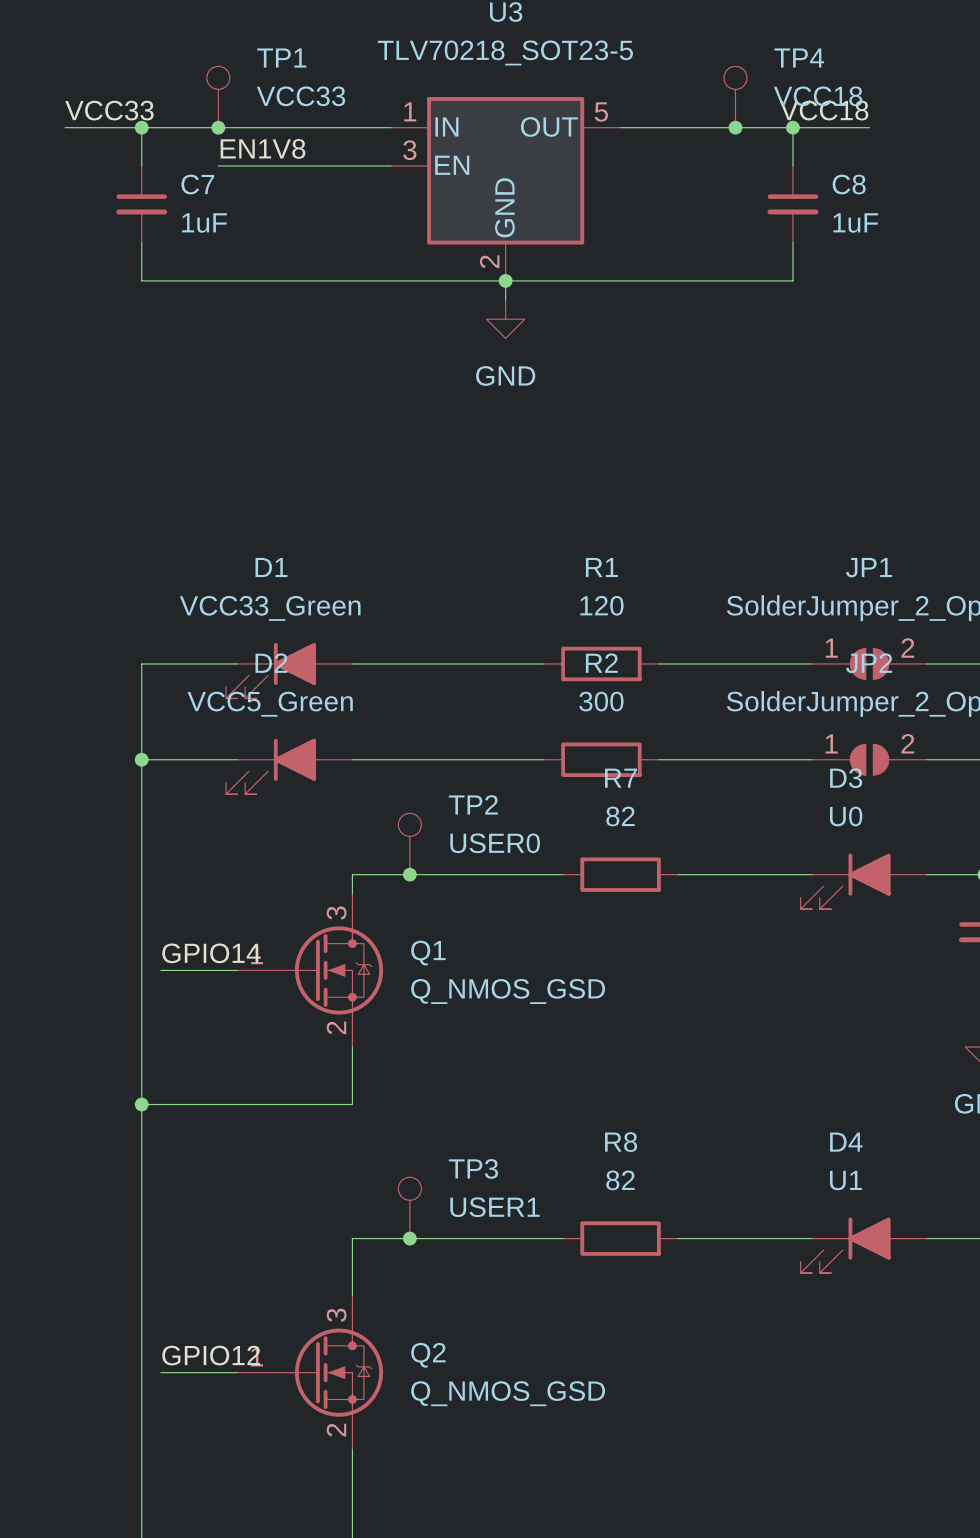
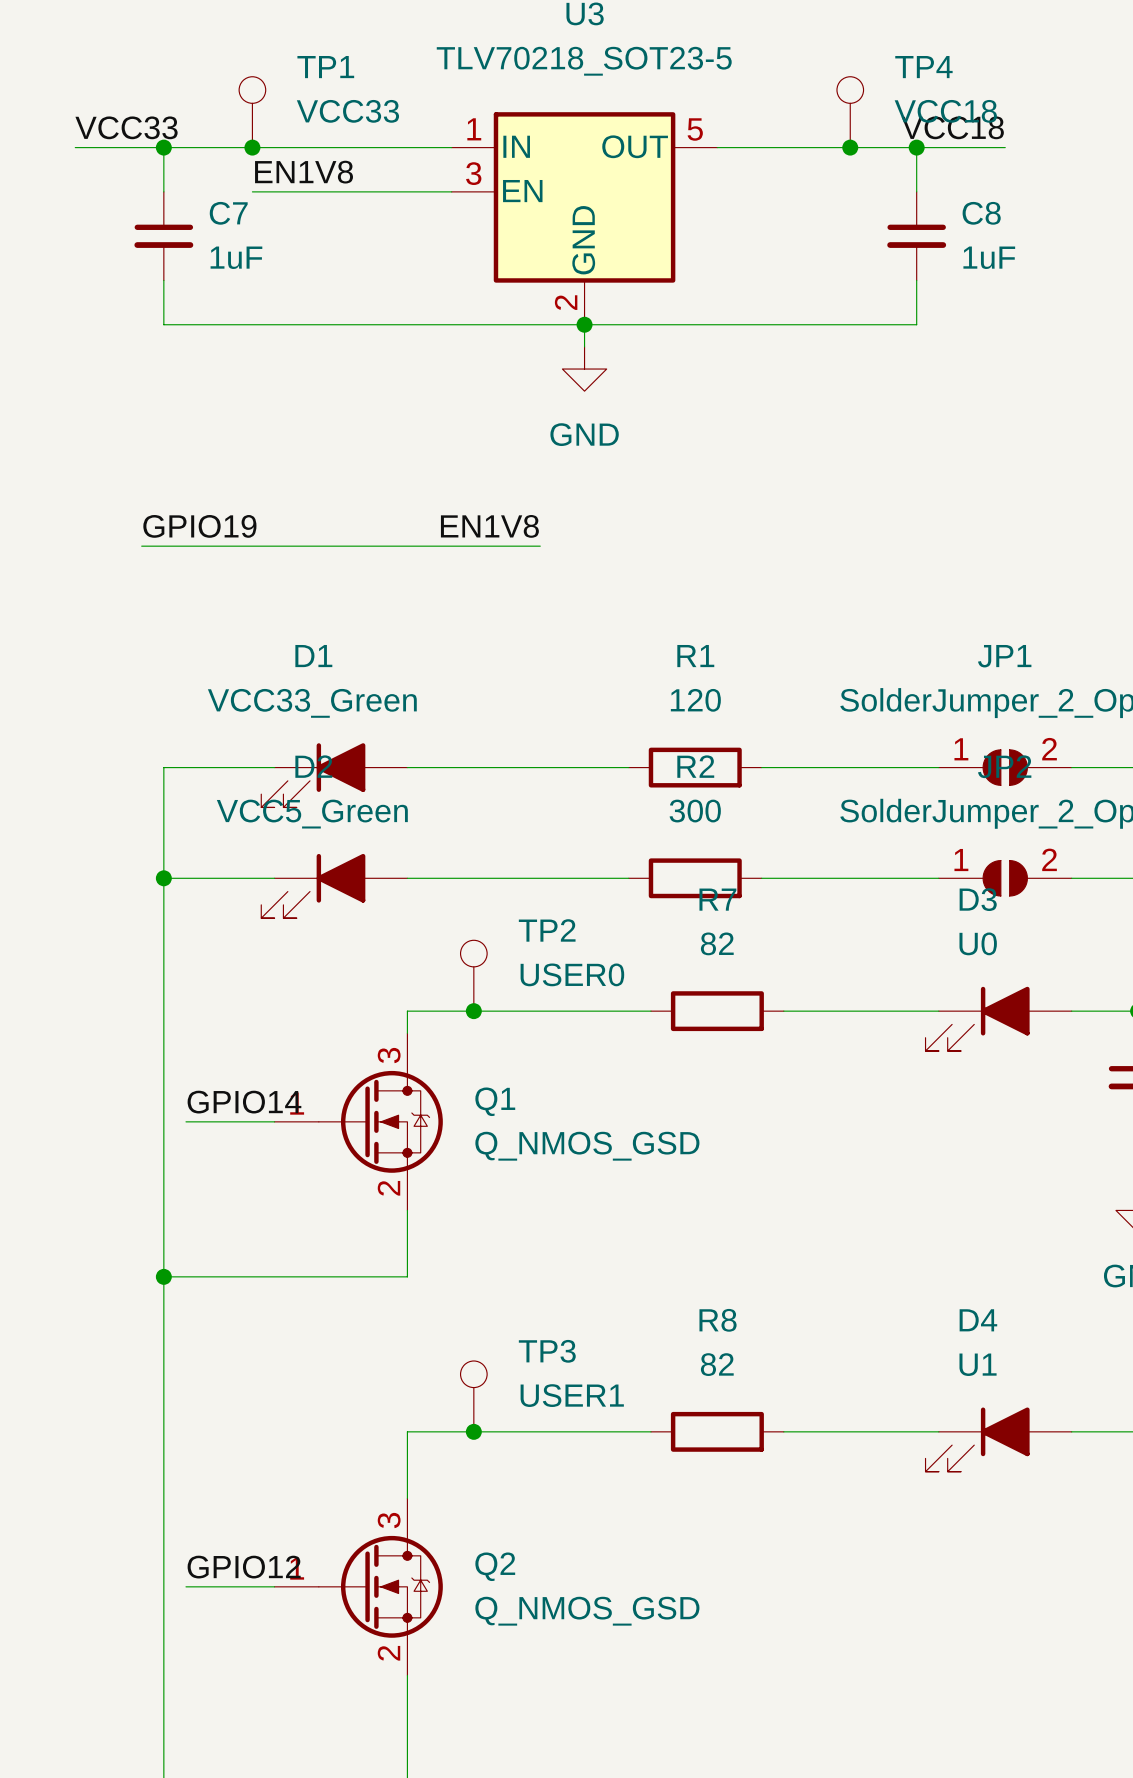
label: none -> GPIO19 (199, 526)
label: none -> EN1V8 (489, 526)
wire: none -> (141, 546) (540, 546)

